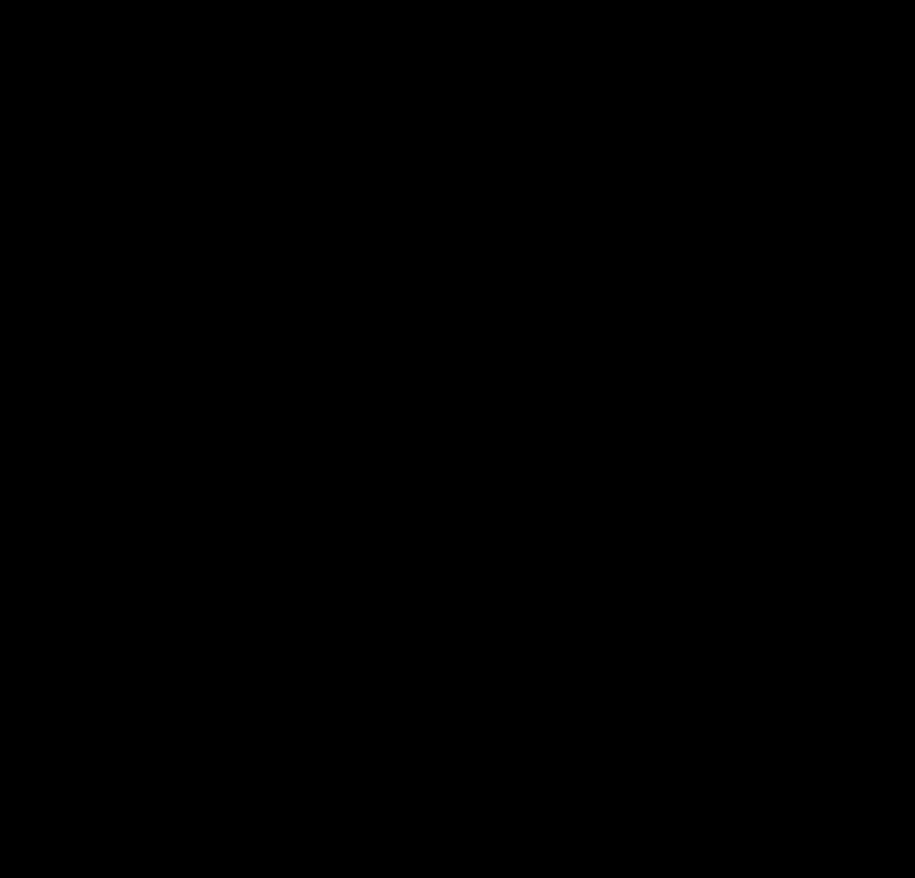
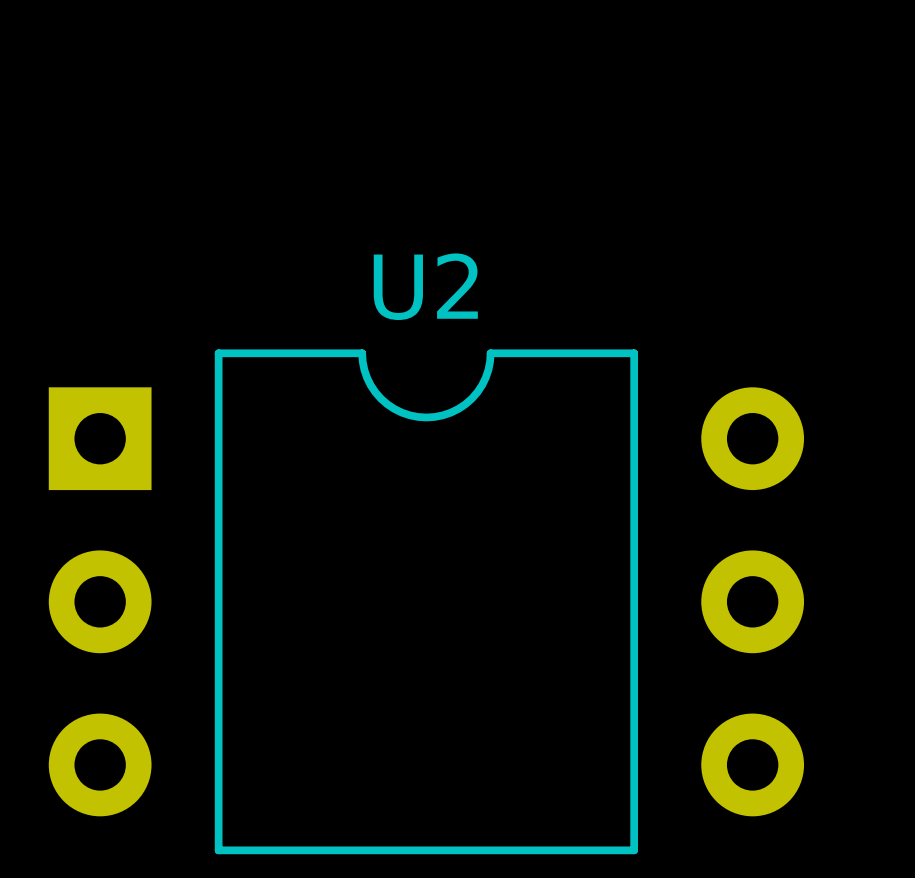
U2: none -> (426, 601)

